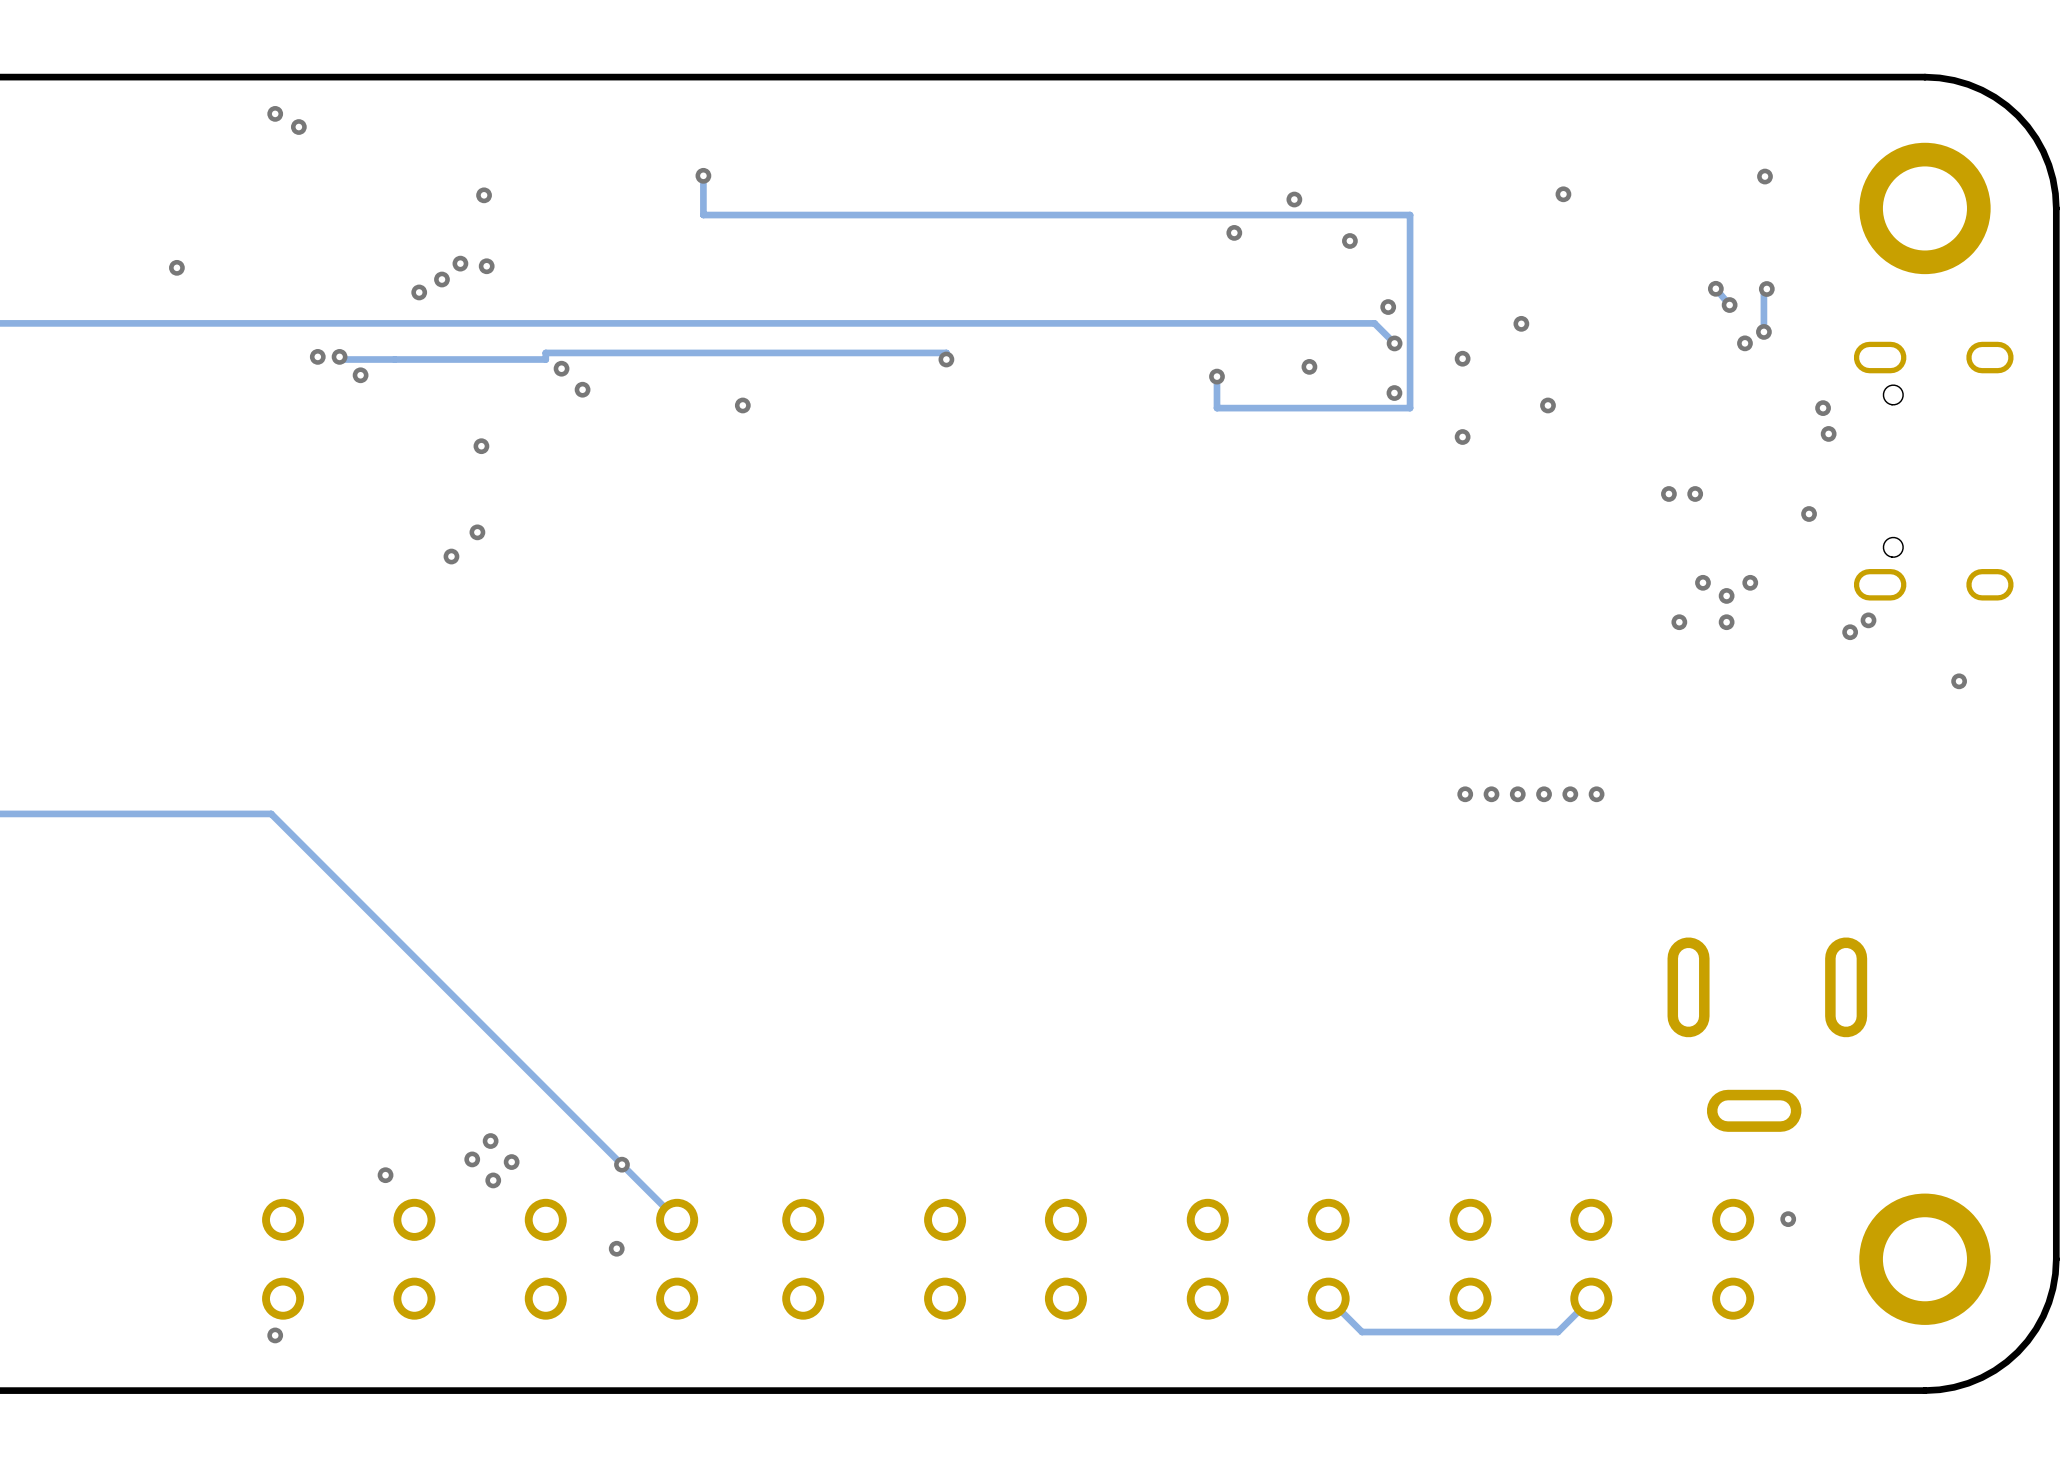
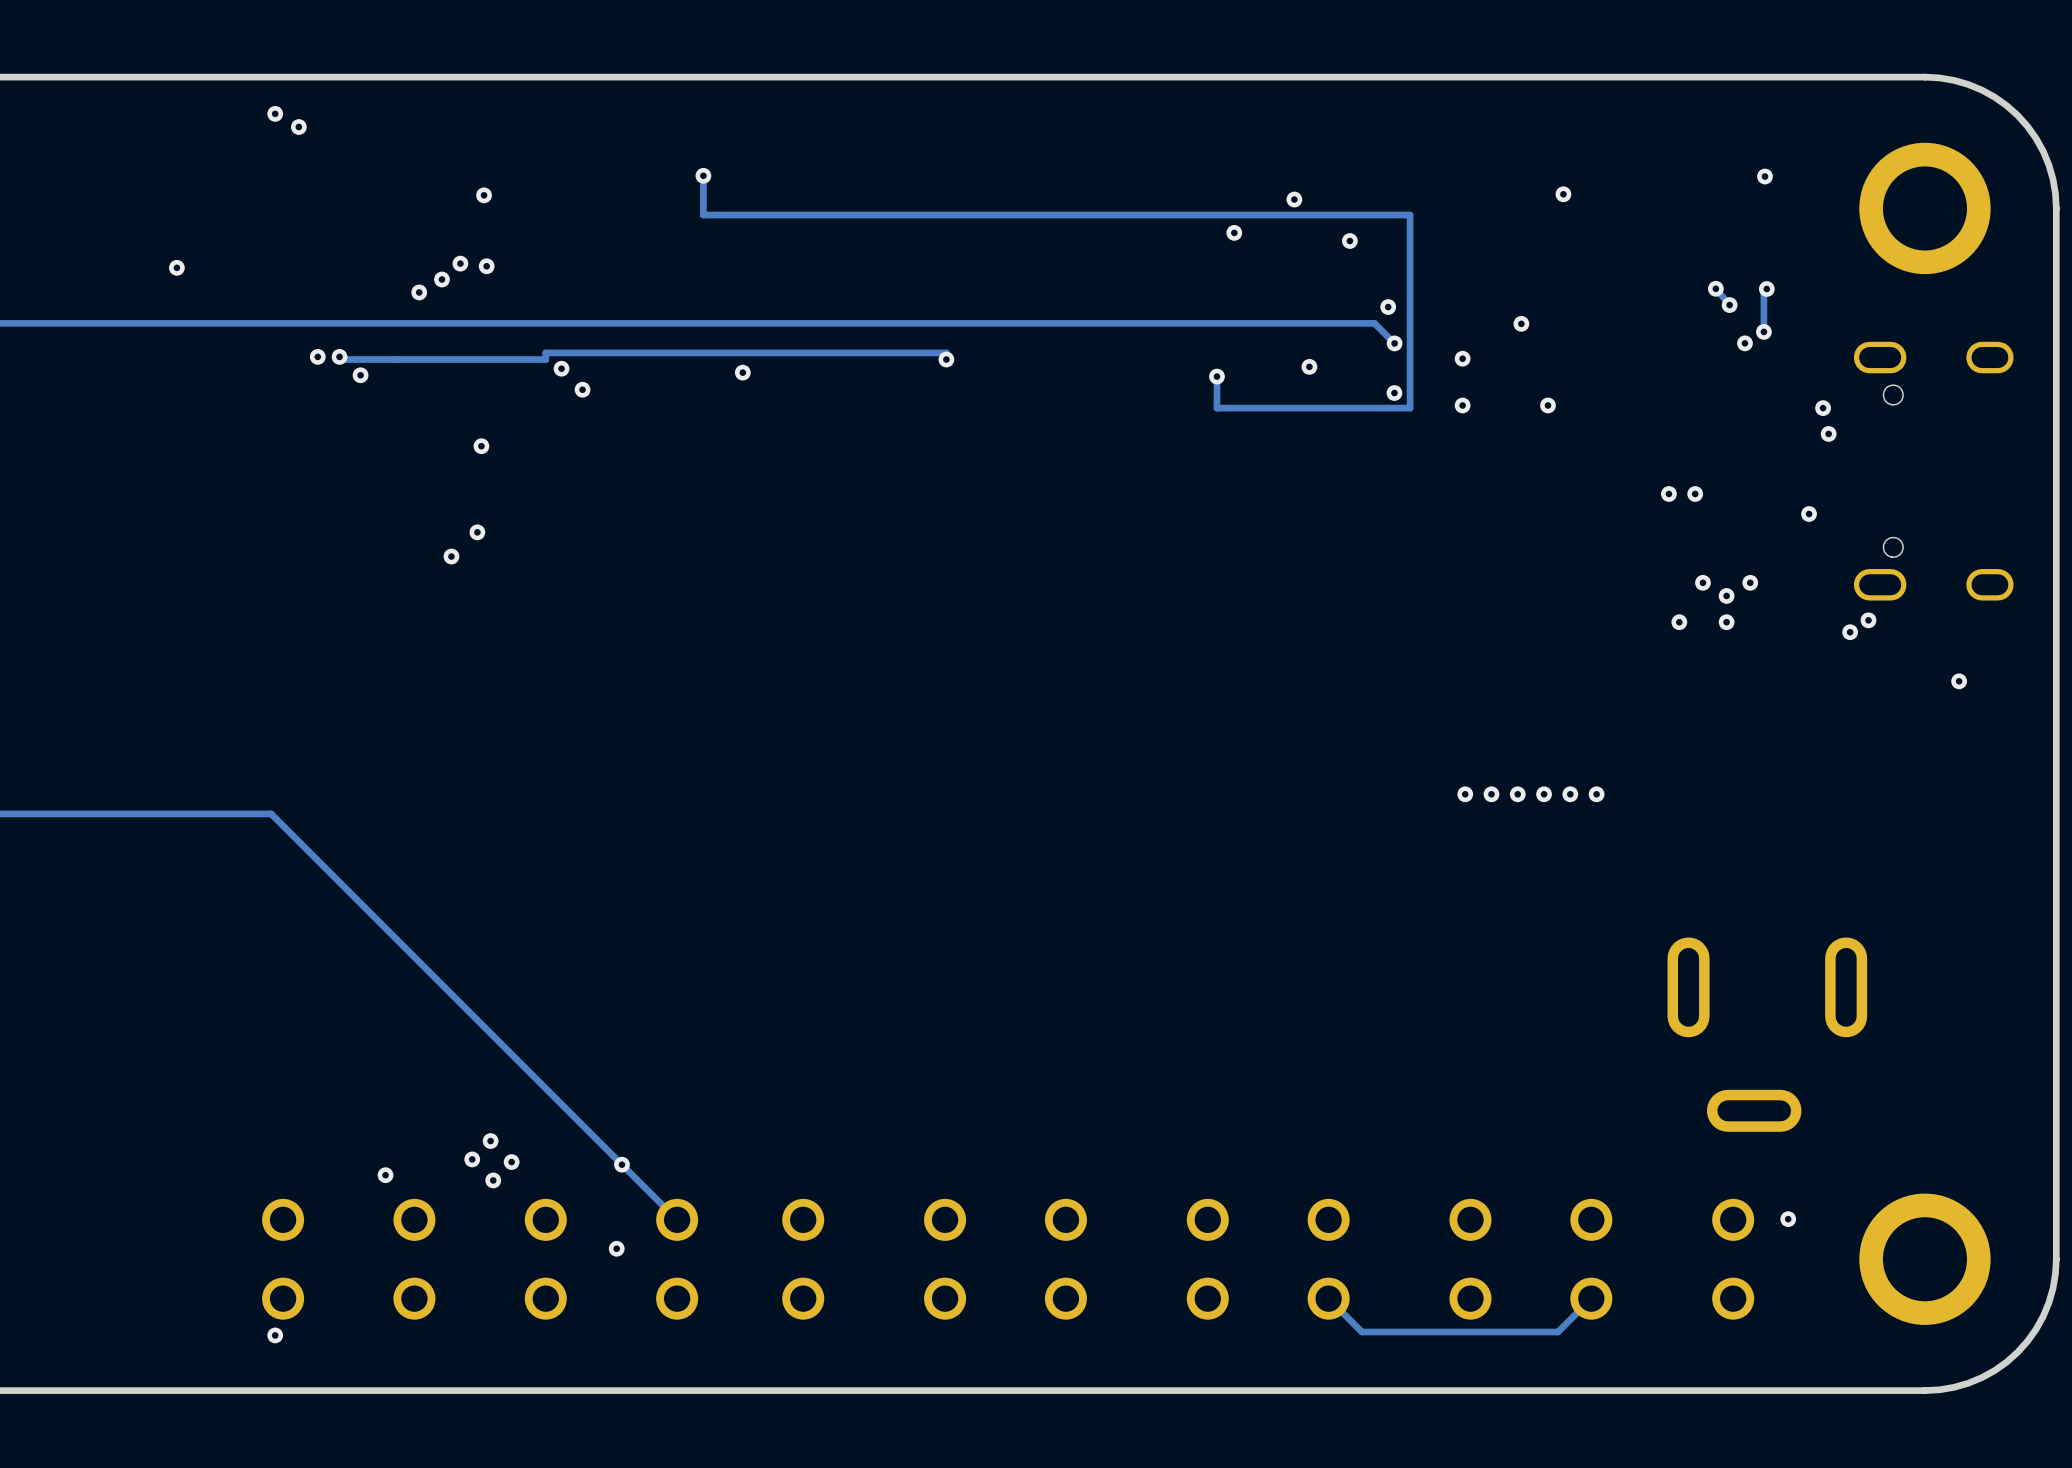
via position: (742, 405) -> (742, 372)
via position: (1462, 437) -> (1462, 405)

